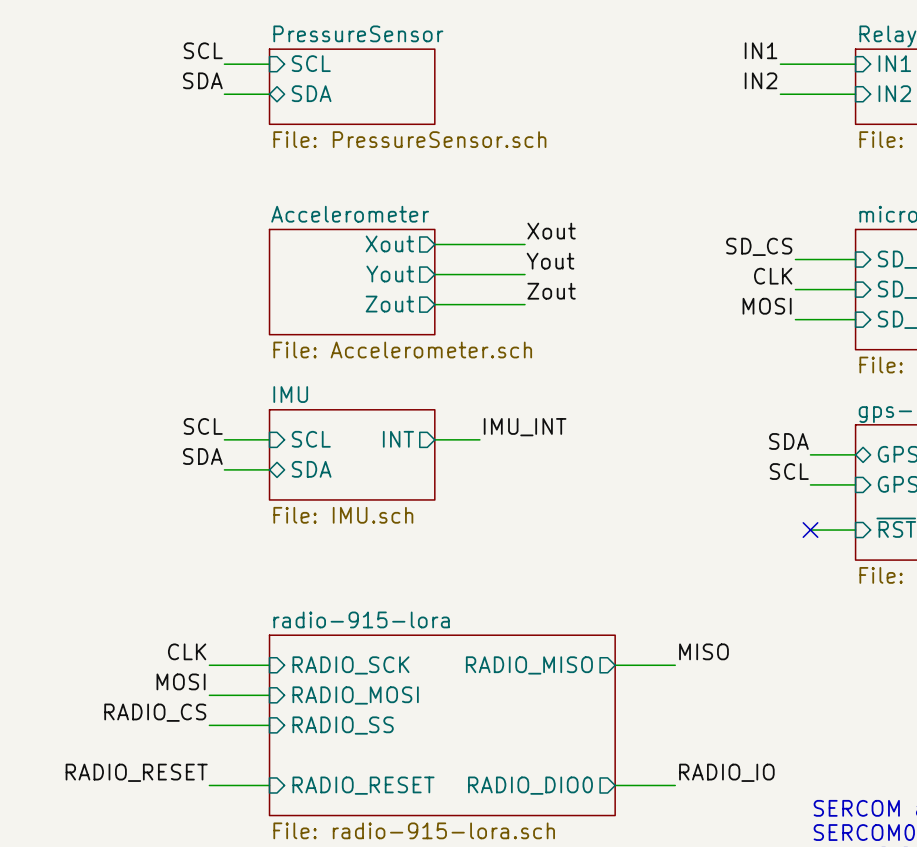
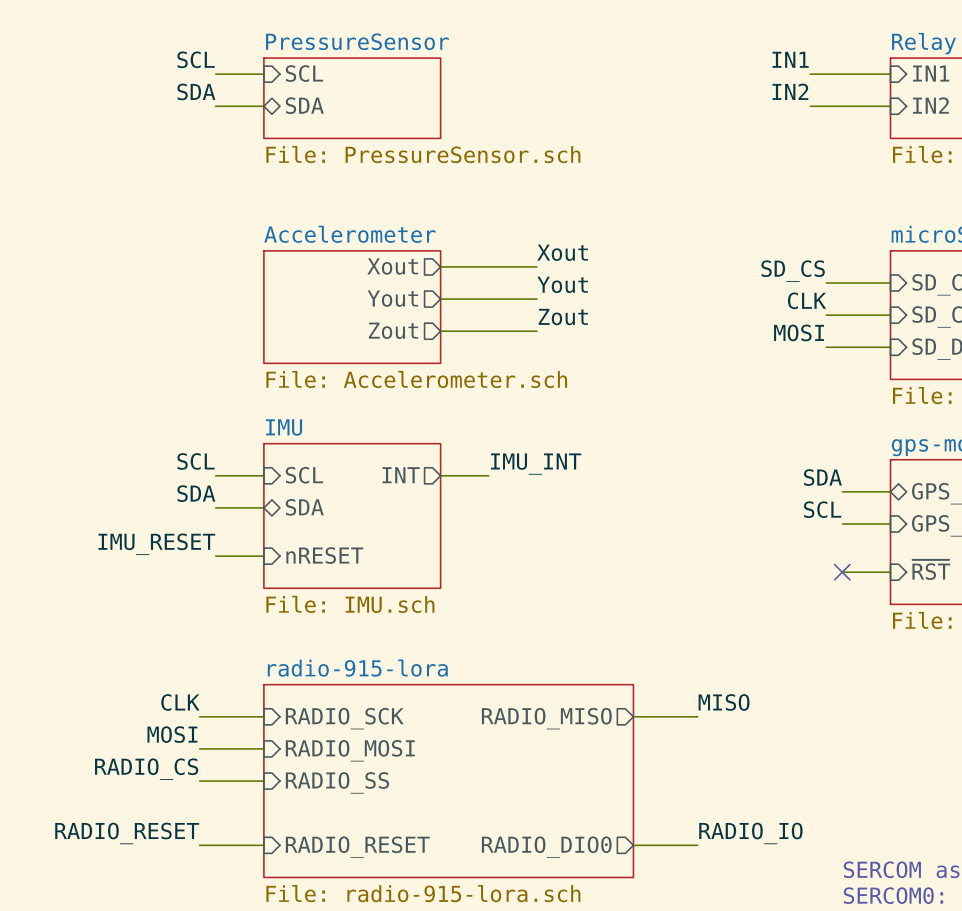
sheet IMU: File: IMU.sch (352, 454) -> none
sheet IMU: none -> File: IMU.sch (352, 515)
label: none -> IMU_RESET (156, 544)
wire: none -> (215, 556) (263, 556)
sheet pin: none -> nRESET (324, 555)

